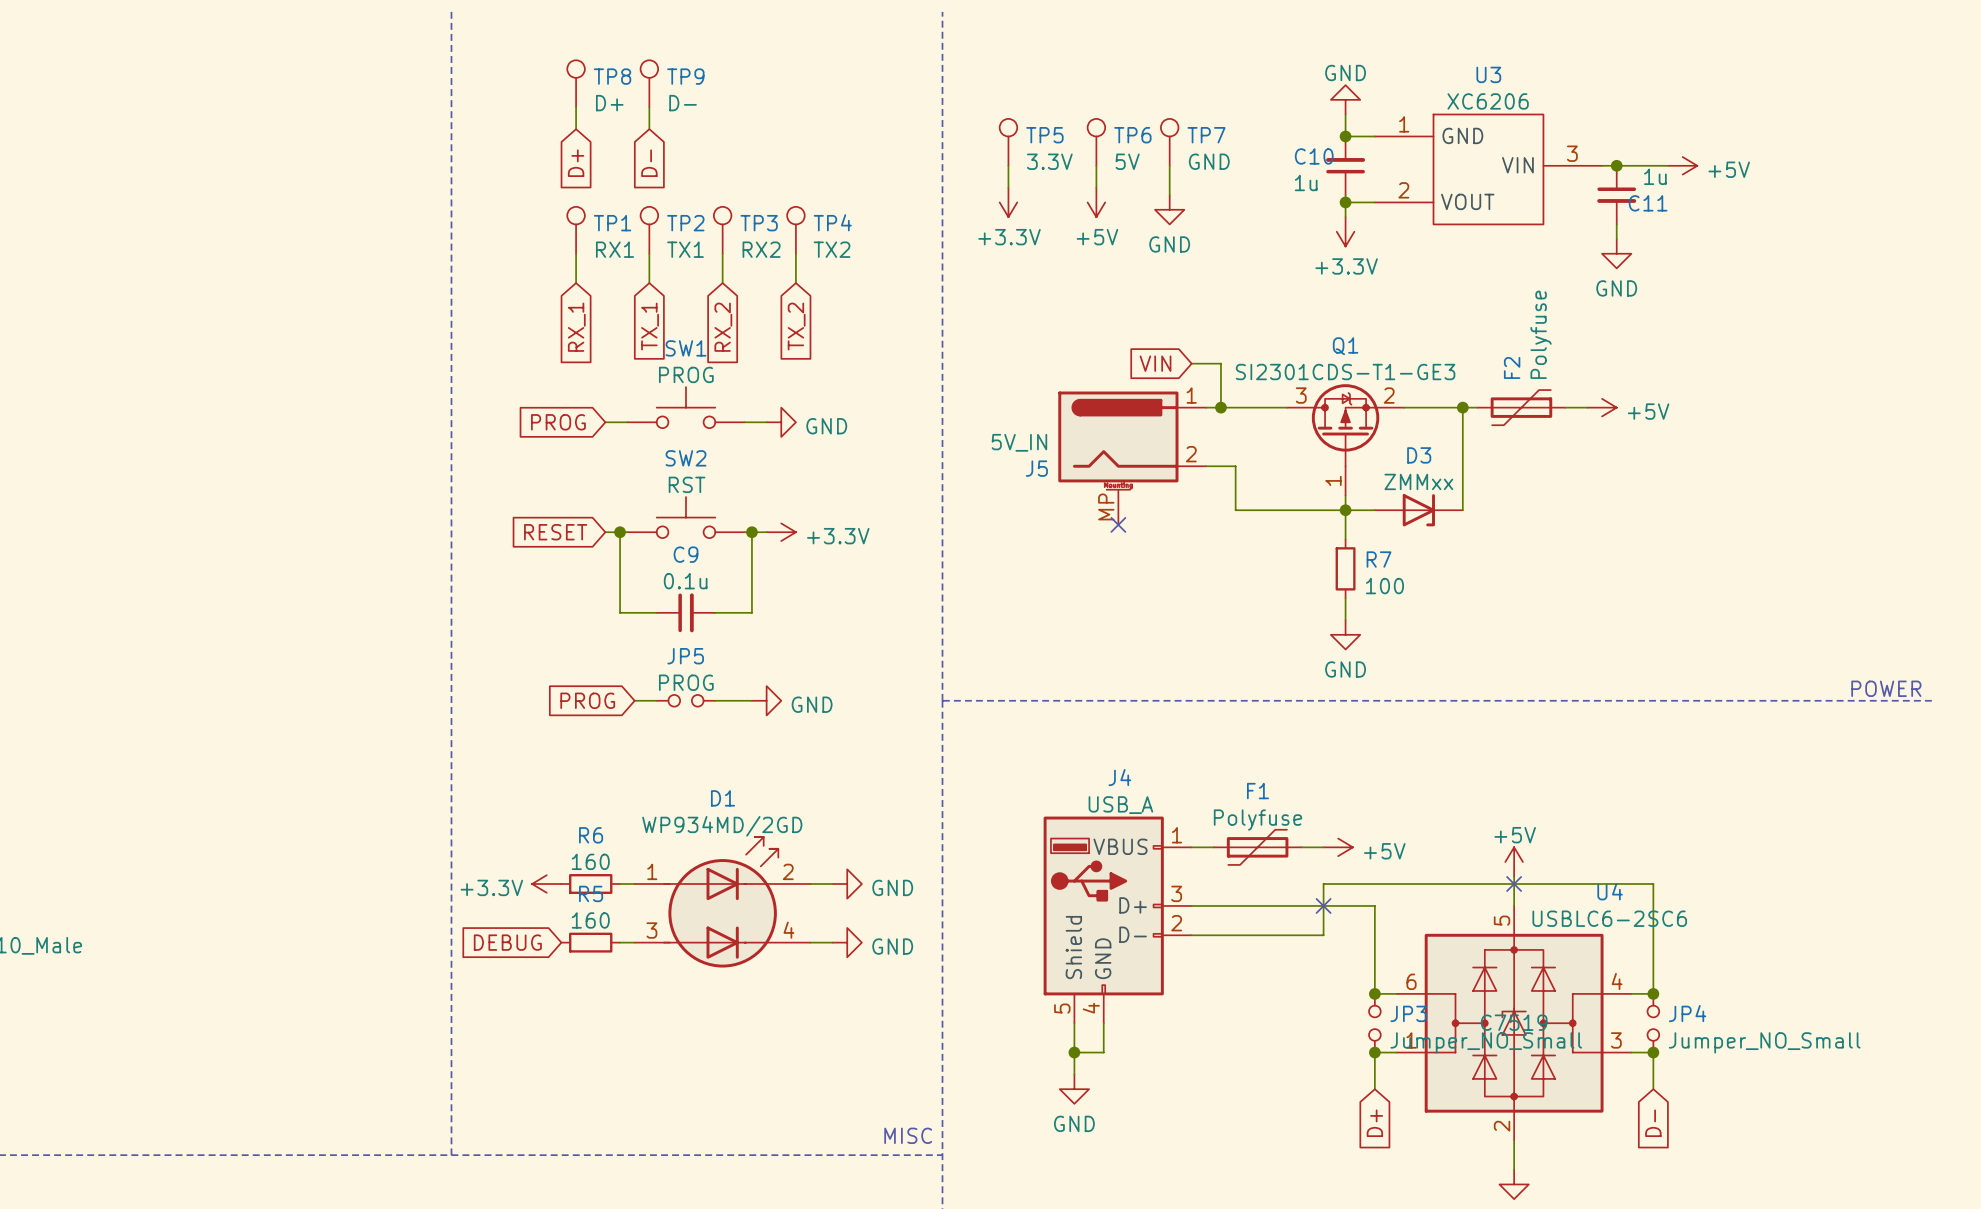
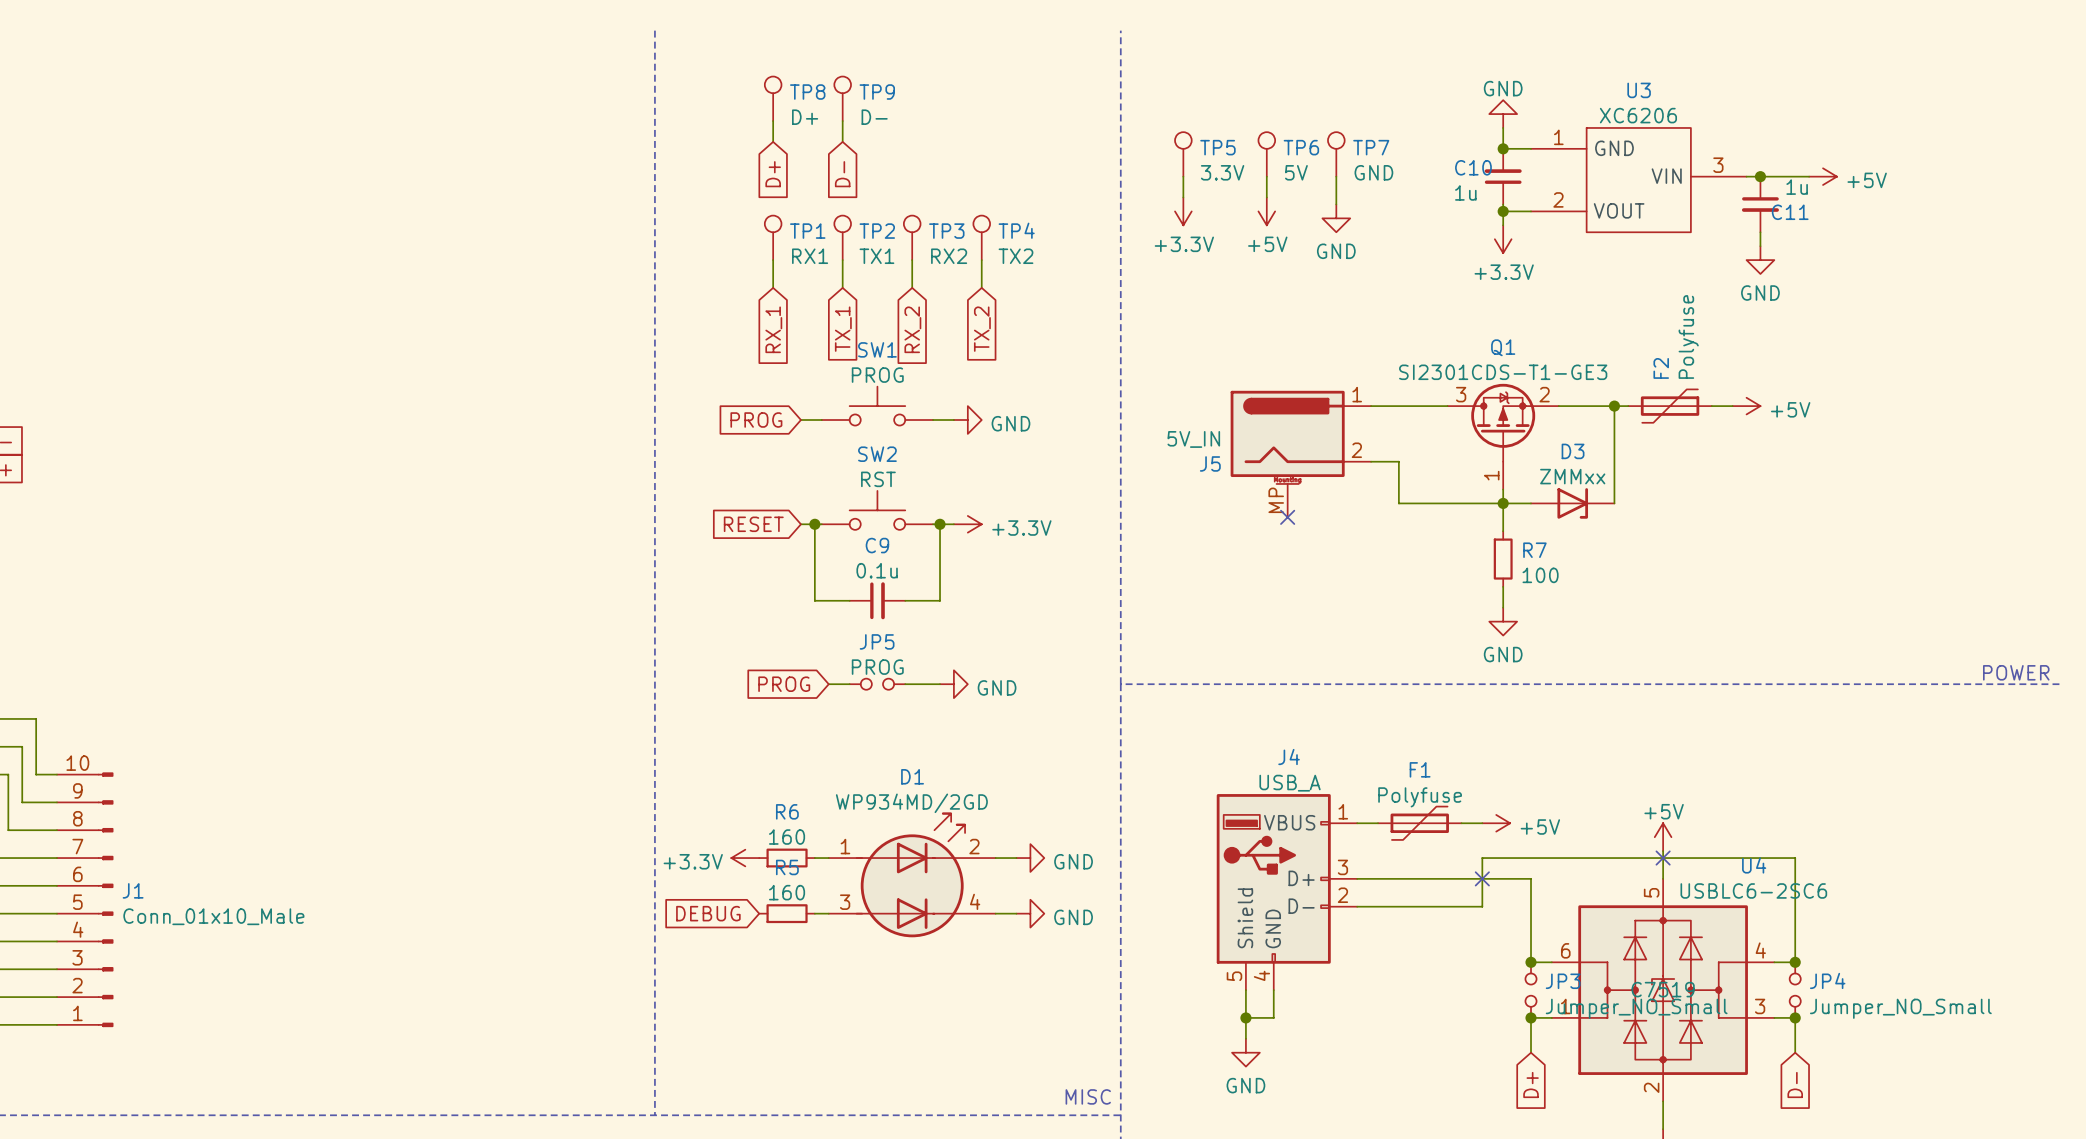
global label: VIN (1155, 363) -> none
wire: (1191, 363) (1220, 363) (1220, 407) -> none
junction: (1220, 407) -> none

